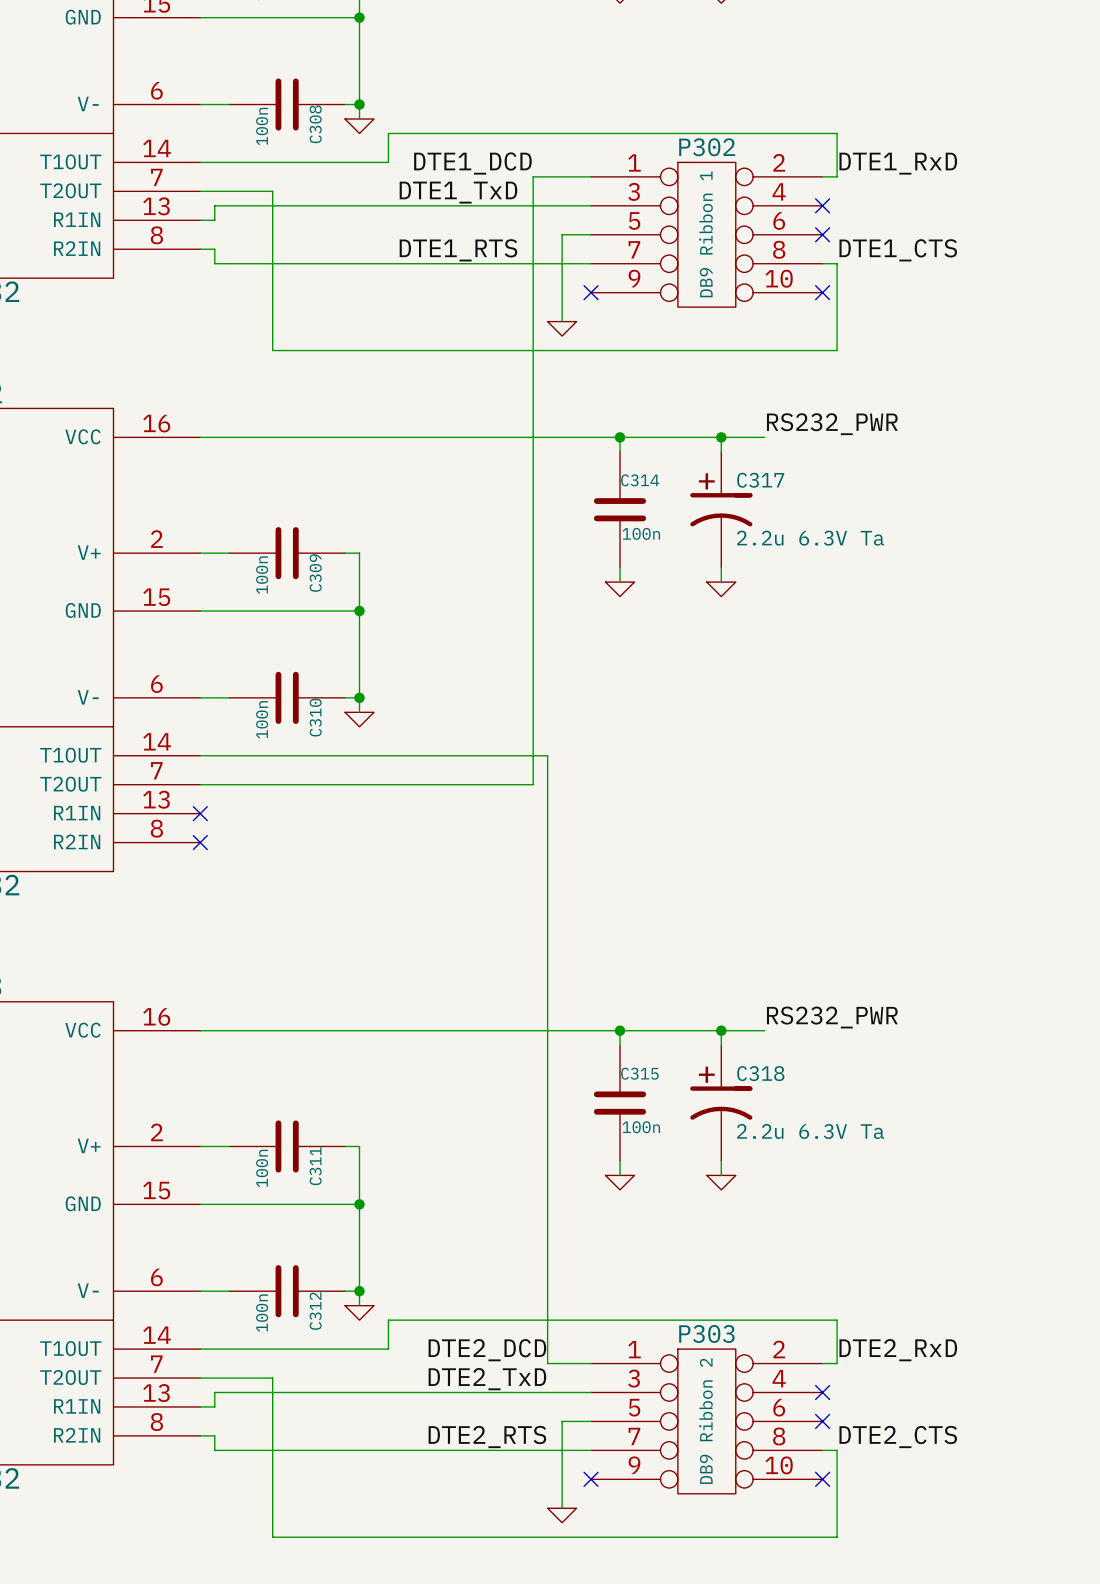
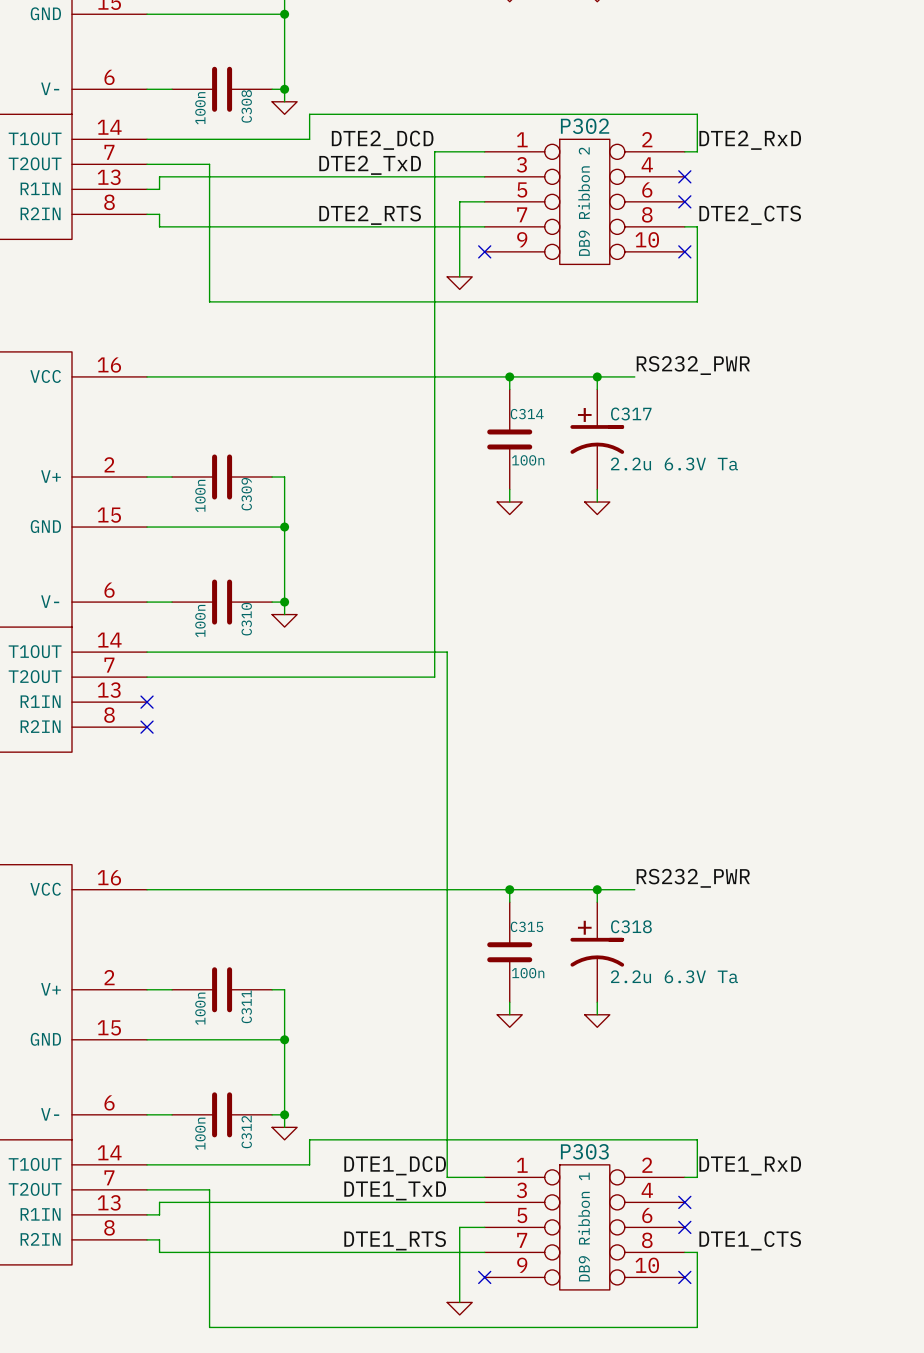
label: DTE1_DCD (472, 163) -> DTE2_DCD (382, 140)
label: DTE1_RxD (898, 163) -> DTE2_RxD (750, 140)
label: DTE1_TxD (458, 192) -> DTE2_TxD (370, 165)
P302 value: DB9 Ribbon 1 (706, 234) -> DB9 Ribbon 2 (584, 201)
label: DTE1_RTS (458, 250) -> DTE2_RTS (370, 215)
label: DTE1_CTS (898, 250) -> DTE2_CTS (750, 215)
label: DTE2_DCD (487, 1350) -> DTE1_DCD (395, 1165)
label: DTE2_RxD (898, 1350) -> DTE1_RxD (750, 1165)
label: DTE2_TxD (487, 1379) -> DTE1_TxD (395, 1190)
P303 value: DB9 Ribbon 2 (706, 1421) -> DB9 Ribbon 1 (584, 1227)
label: DTE2_RTS (487, 1437) -> DTE1_RTS (395, 1240)
label: DTE2_CTS (898, 1437) -> DTE1_CTS (750, 1240)

